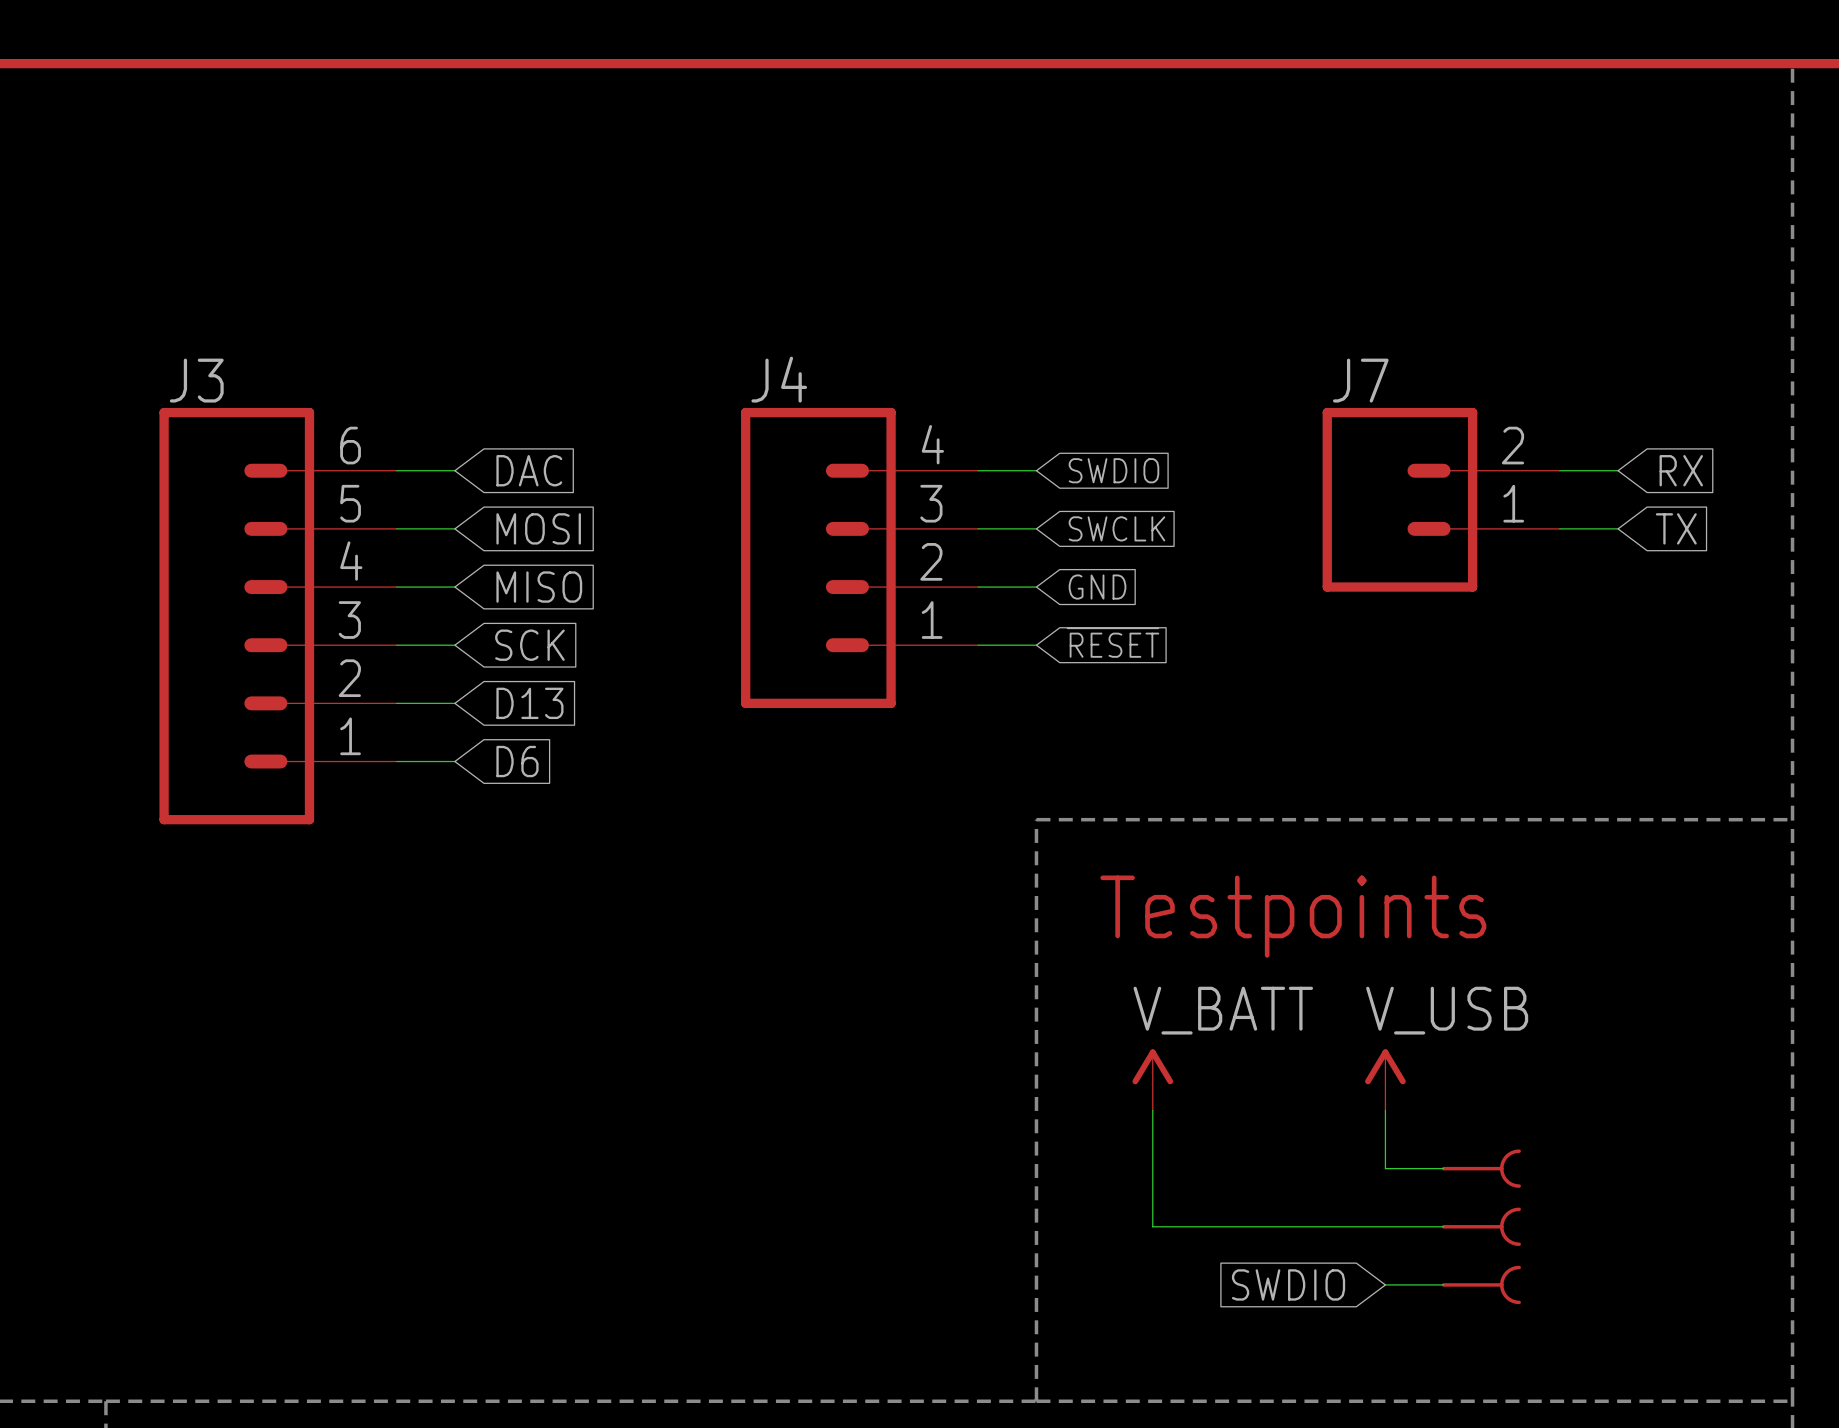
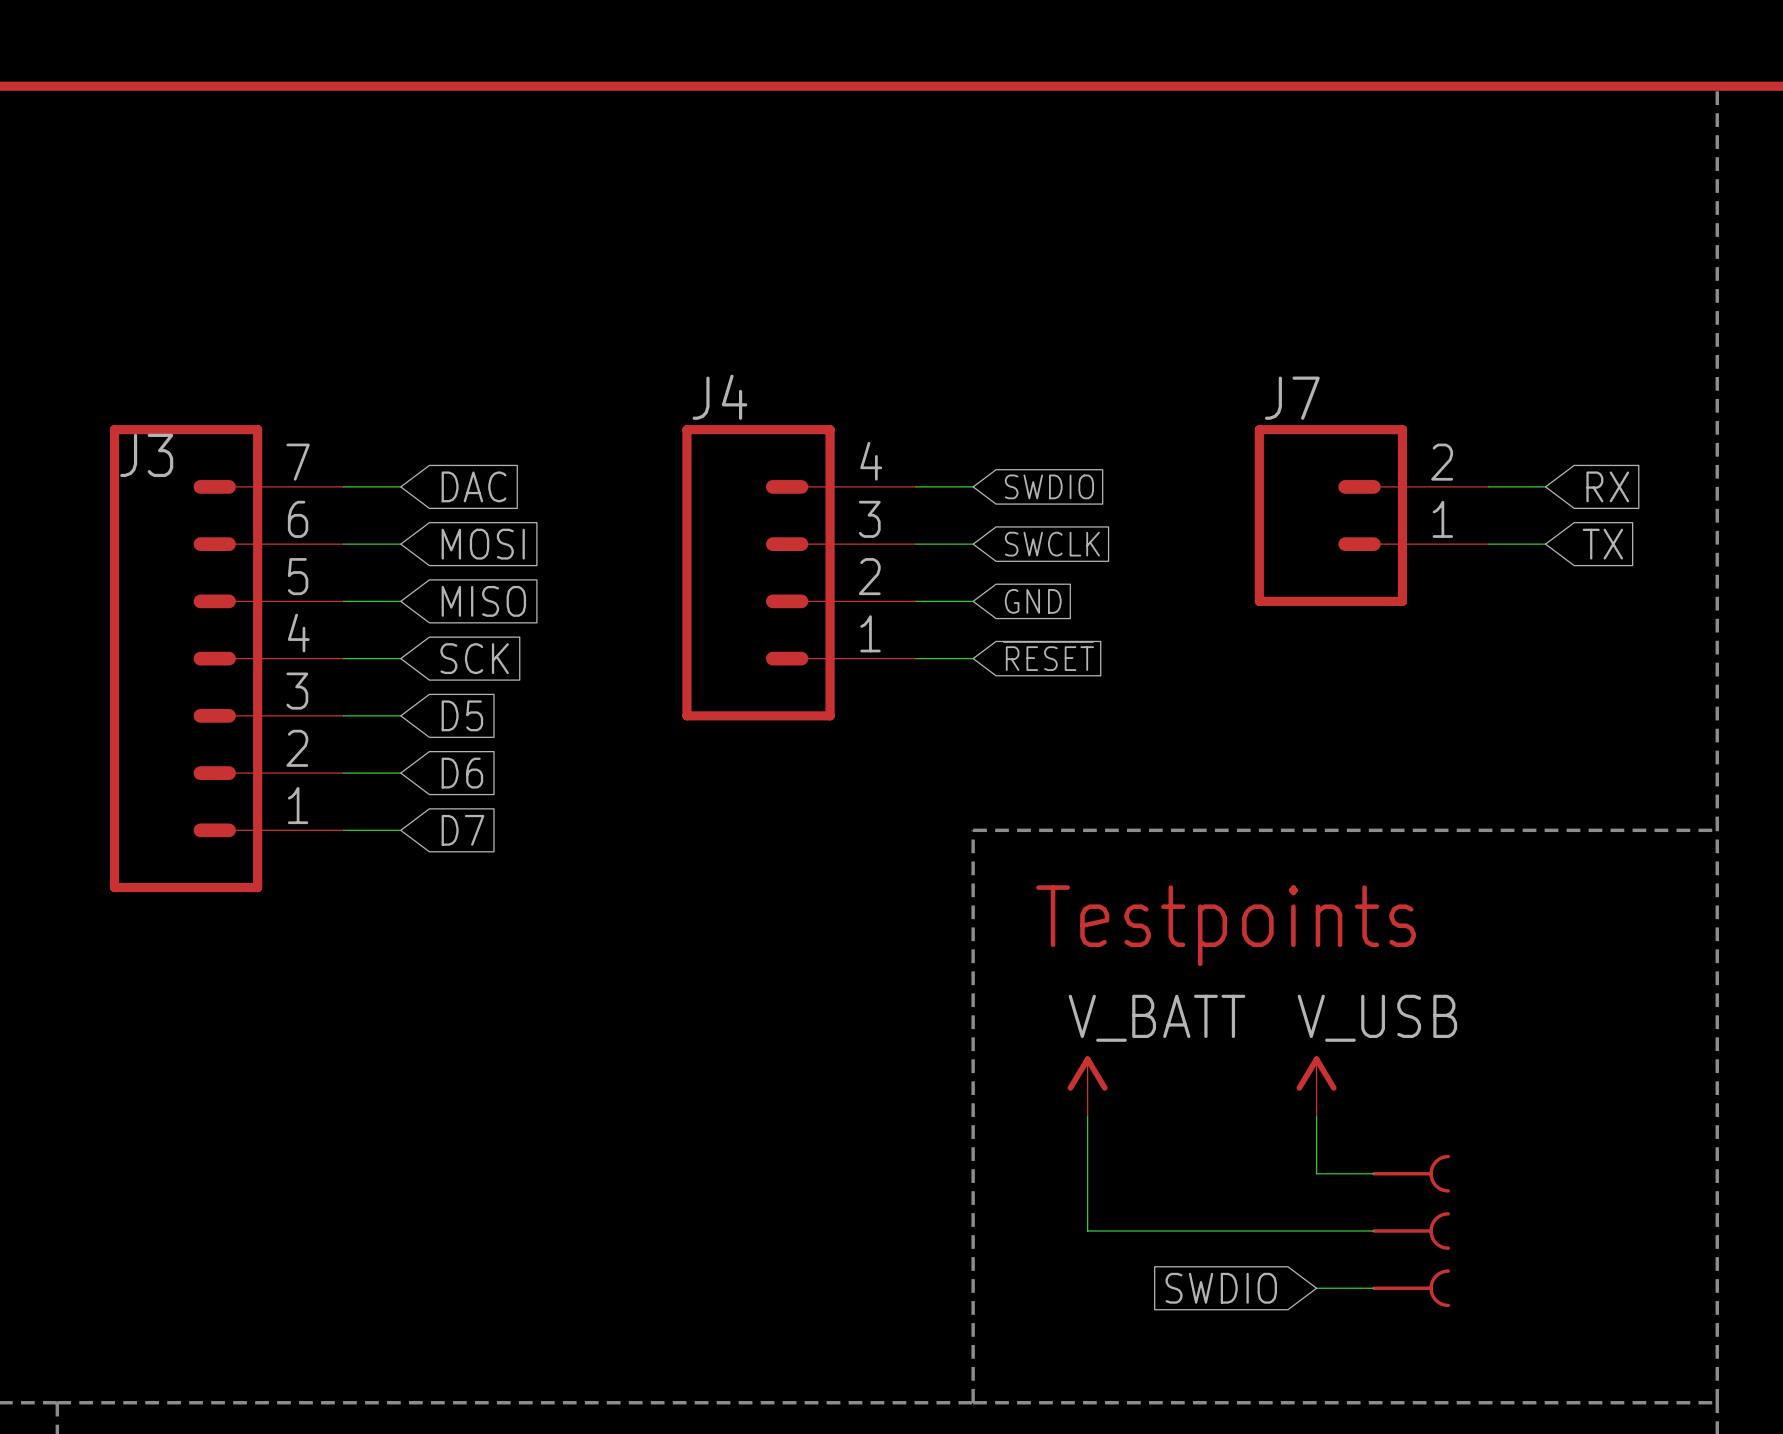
J3 symbol: [159, 407, 397, 825] -> [109, 425, 344, 893]
global label: D13 (529, 703) -> D5 (462, 715)
wire: none -> (343, 830) (400, 830)
global label: none -> D7 (462, 830)

